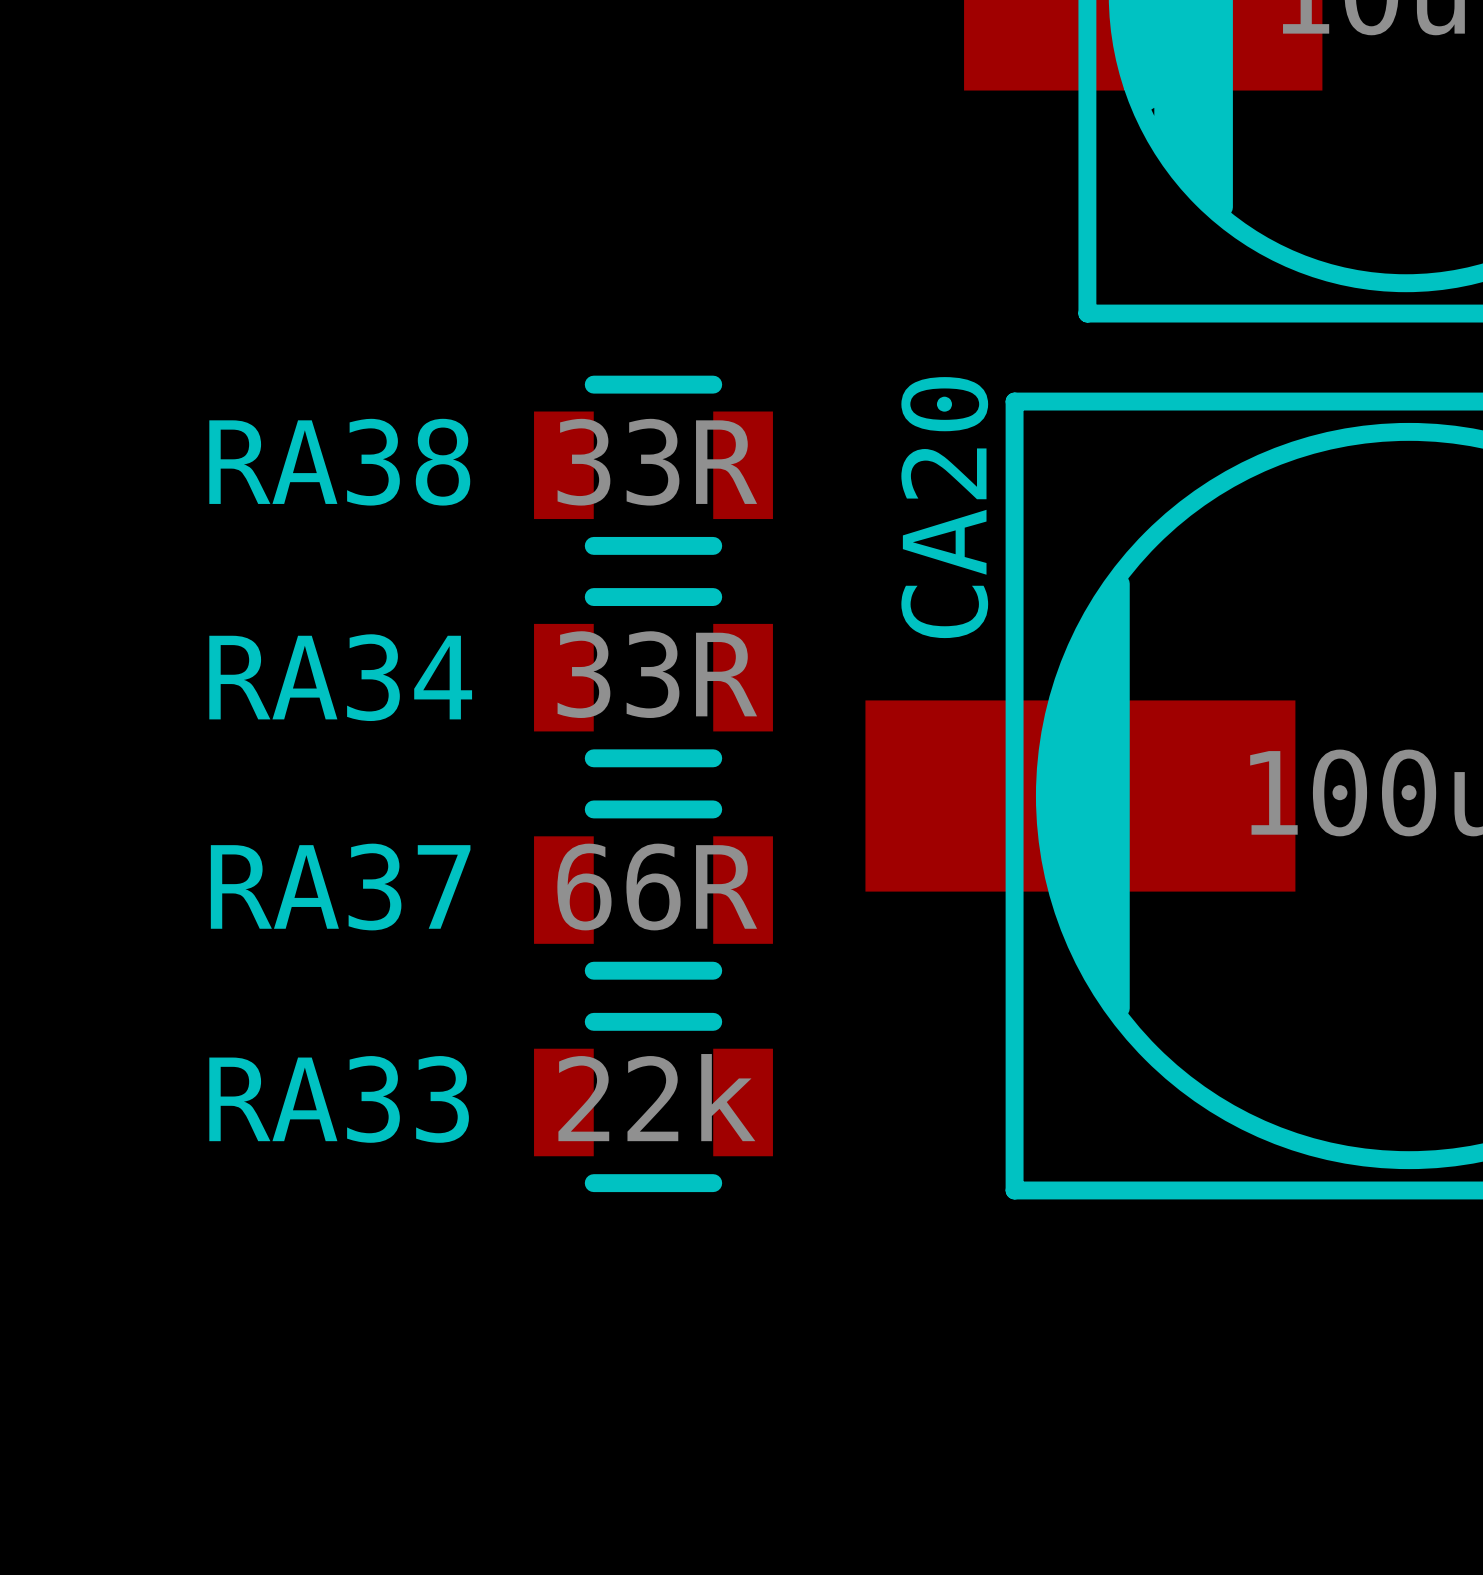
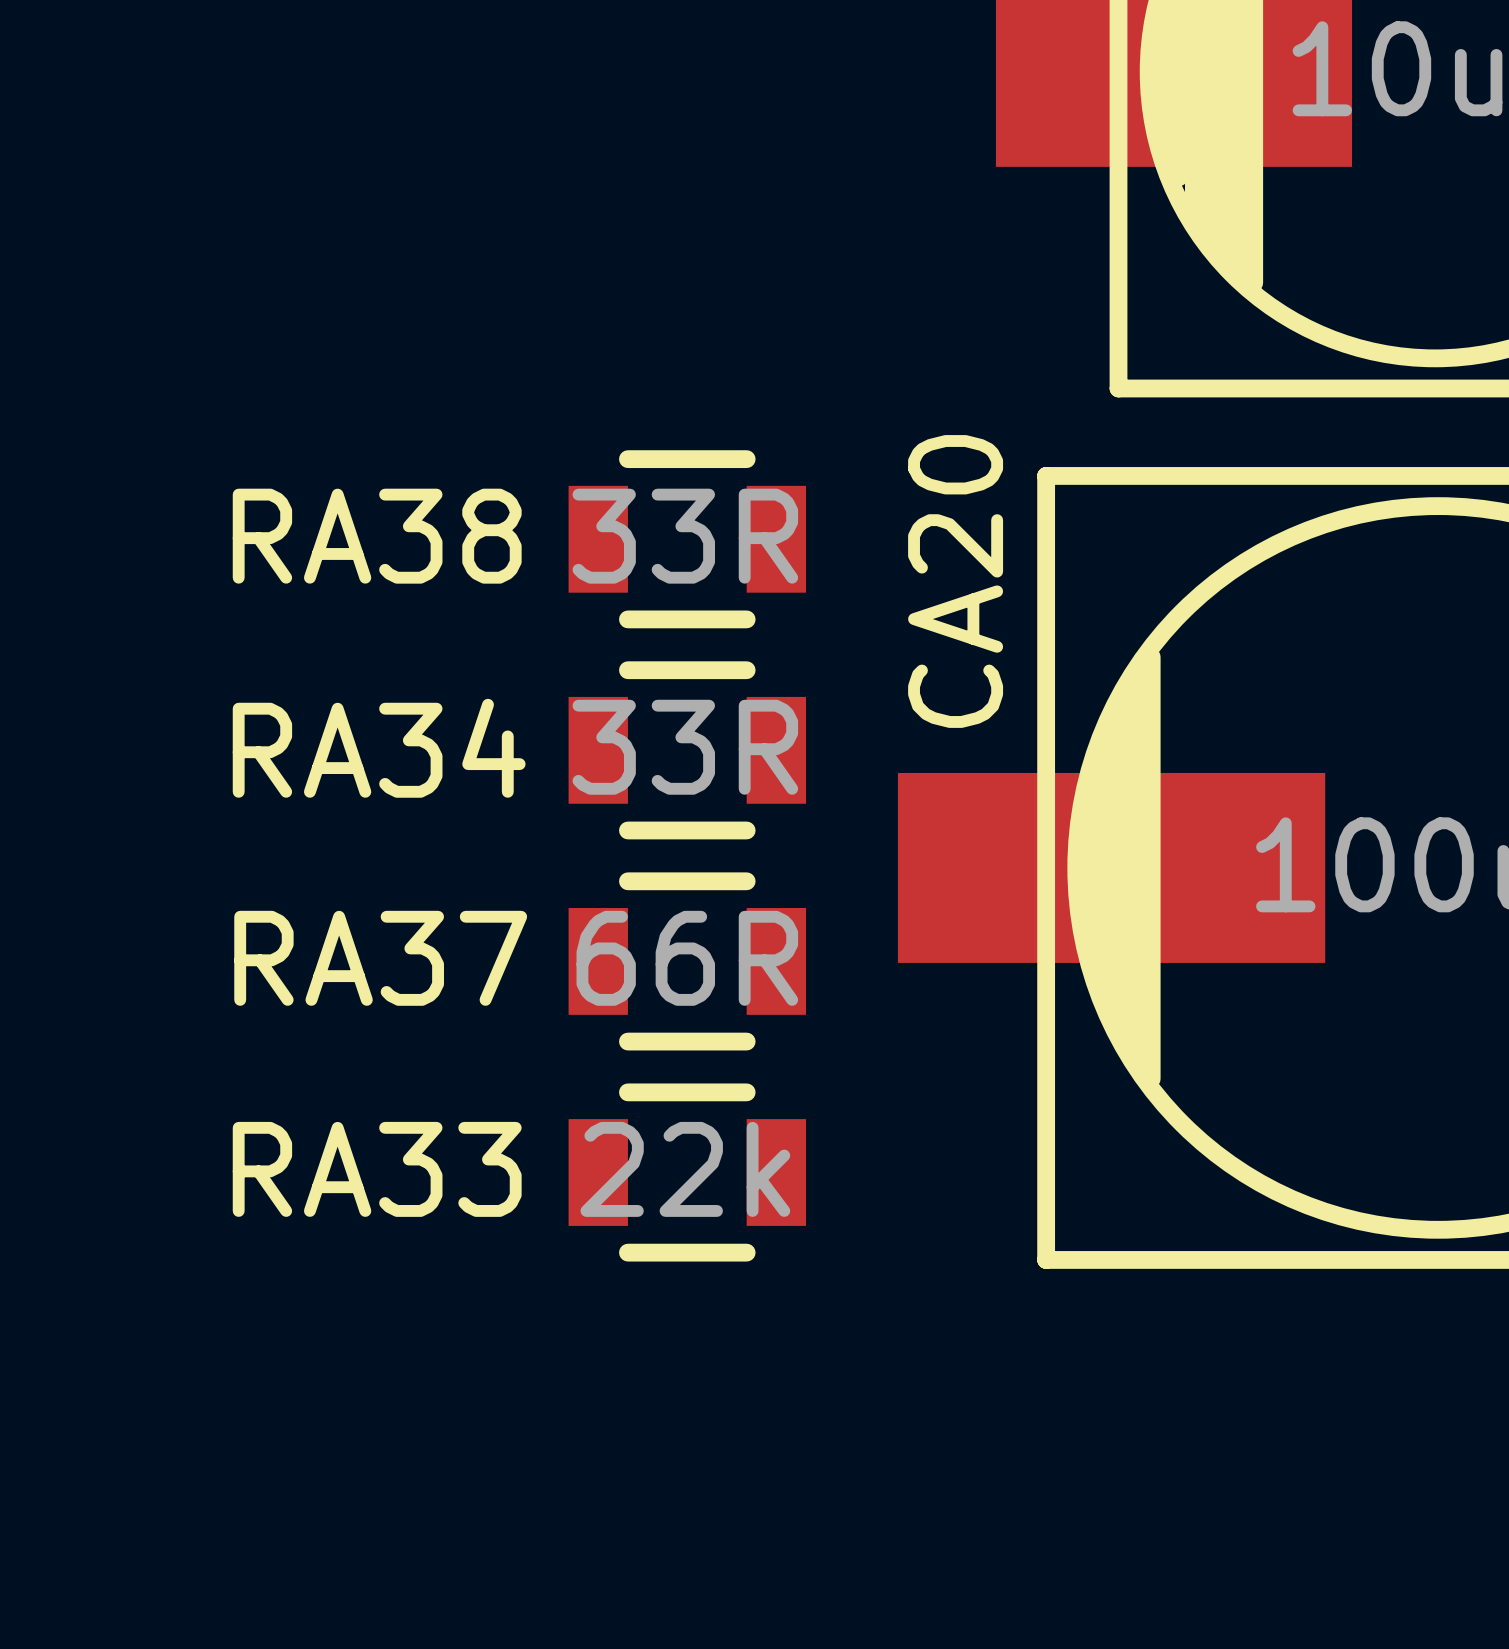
CA20 name position: CA20 (944, 507) -> CA20 (955, 581)

